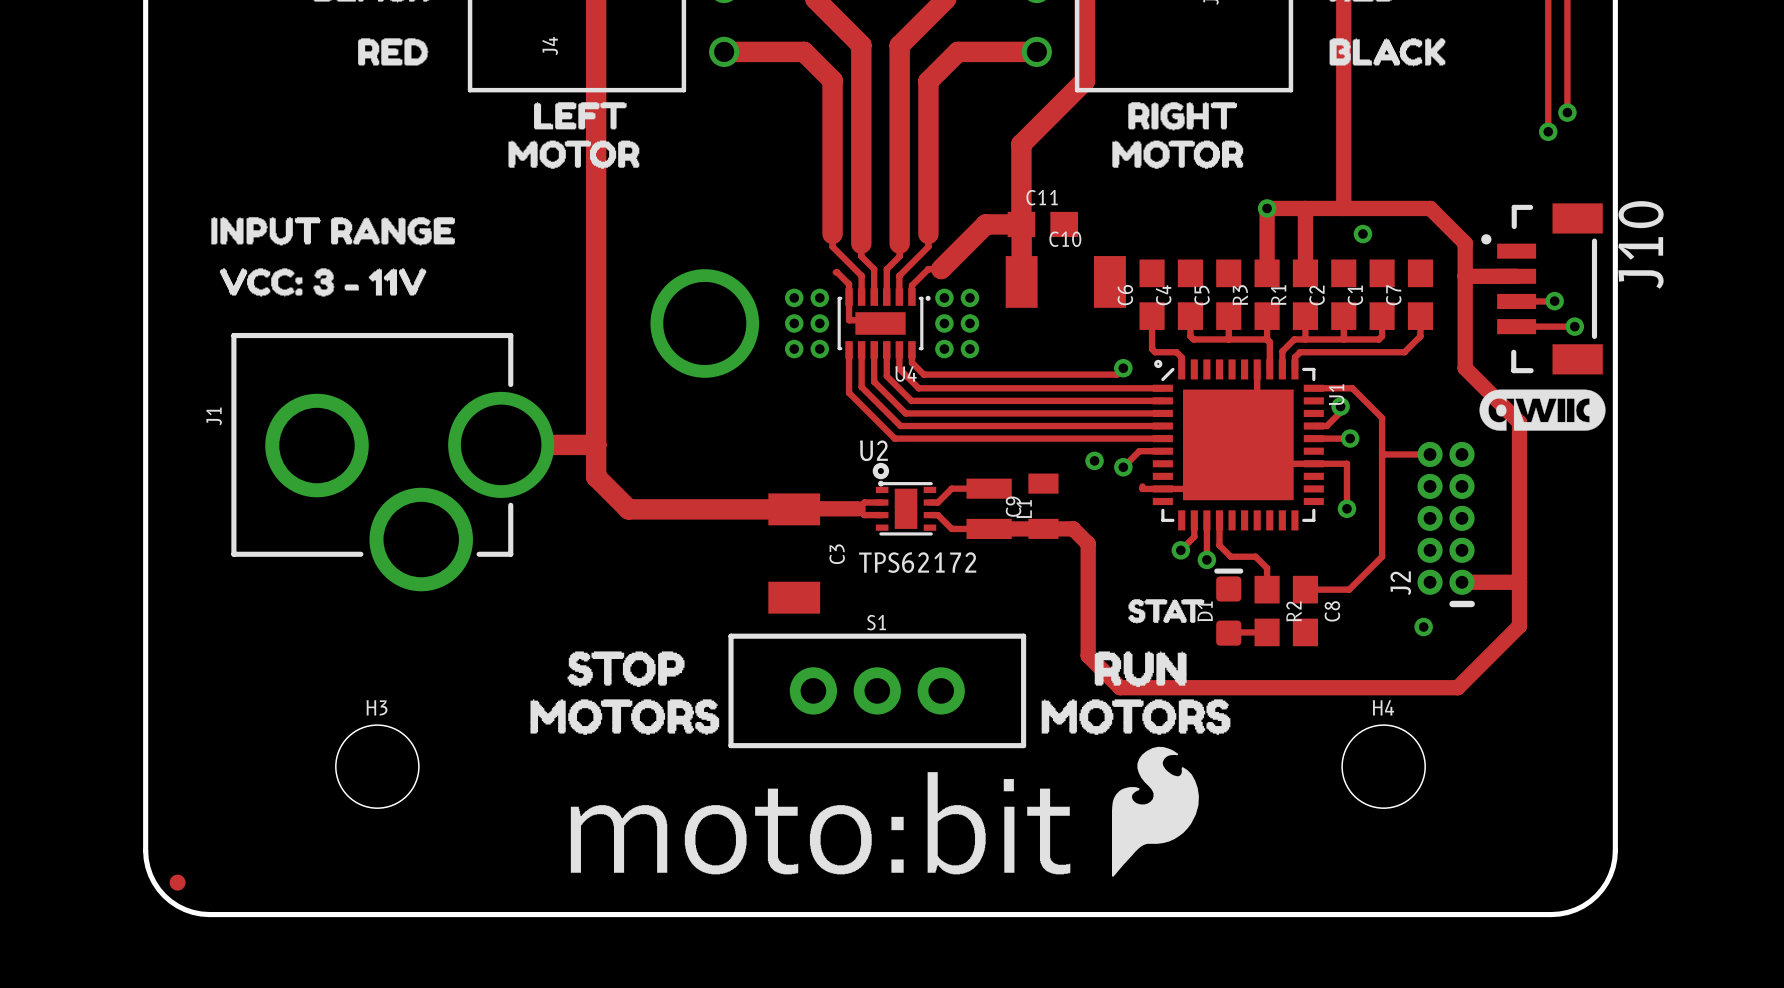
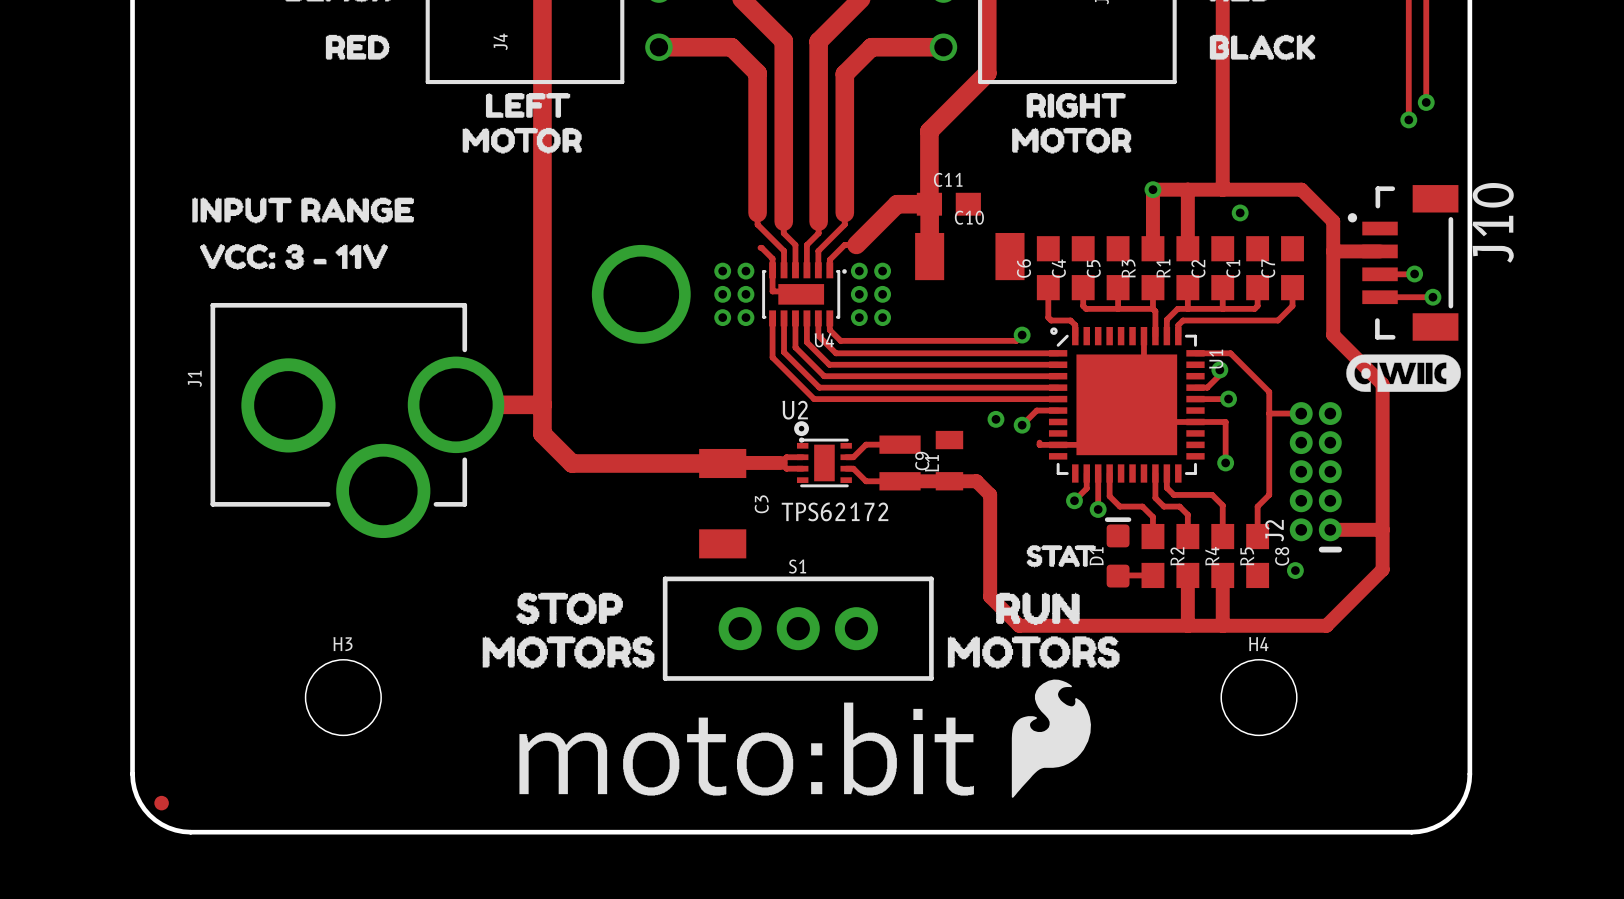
track: (1382, 417) (1382, 556) (1349, 589) (1305, 589) -> (1257, 380) (1269, 391) (1269, 494) (1257, 506) (1257, 536)
track: (1382, 454) (1394, 454) -> none
track: none -> (1155, 473) (1155, 498) (1163, 506) (1179, 506) (1187, 514) (1187, 536)
track: none -> (1166, 473) (1166, 487) (1173, 494) (1212, 494) (1222, 505) (1222, 536)
C8 name: C8 (1332, 611) -> R4 (1212, 556)
R5: none -> (1222, 556)
C8: none -> (1257, 556)
track: none -> (1187, 575) (1187, 625)
track: none -> (1222, 575) (1222, 625)

